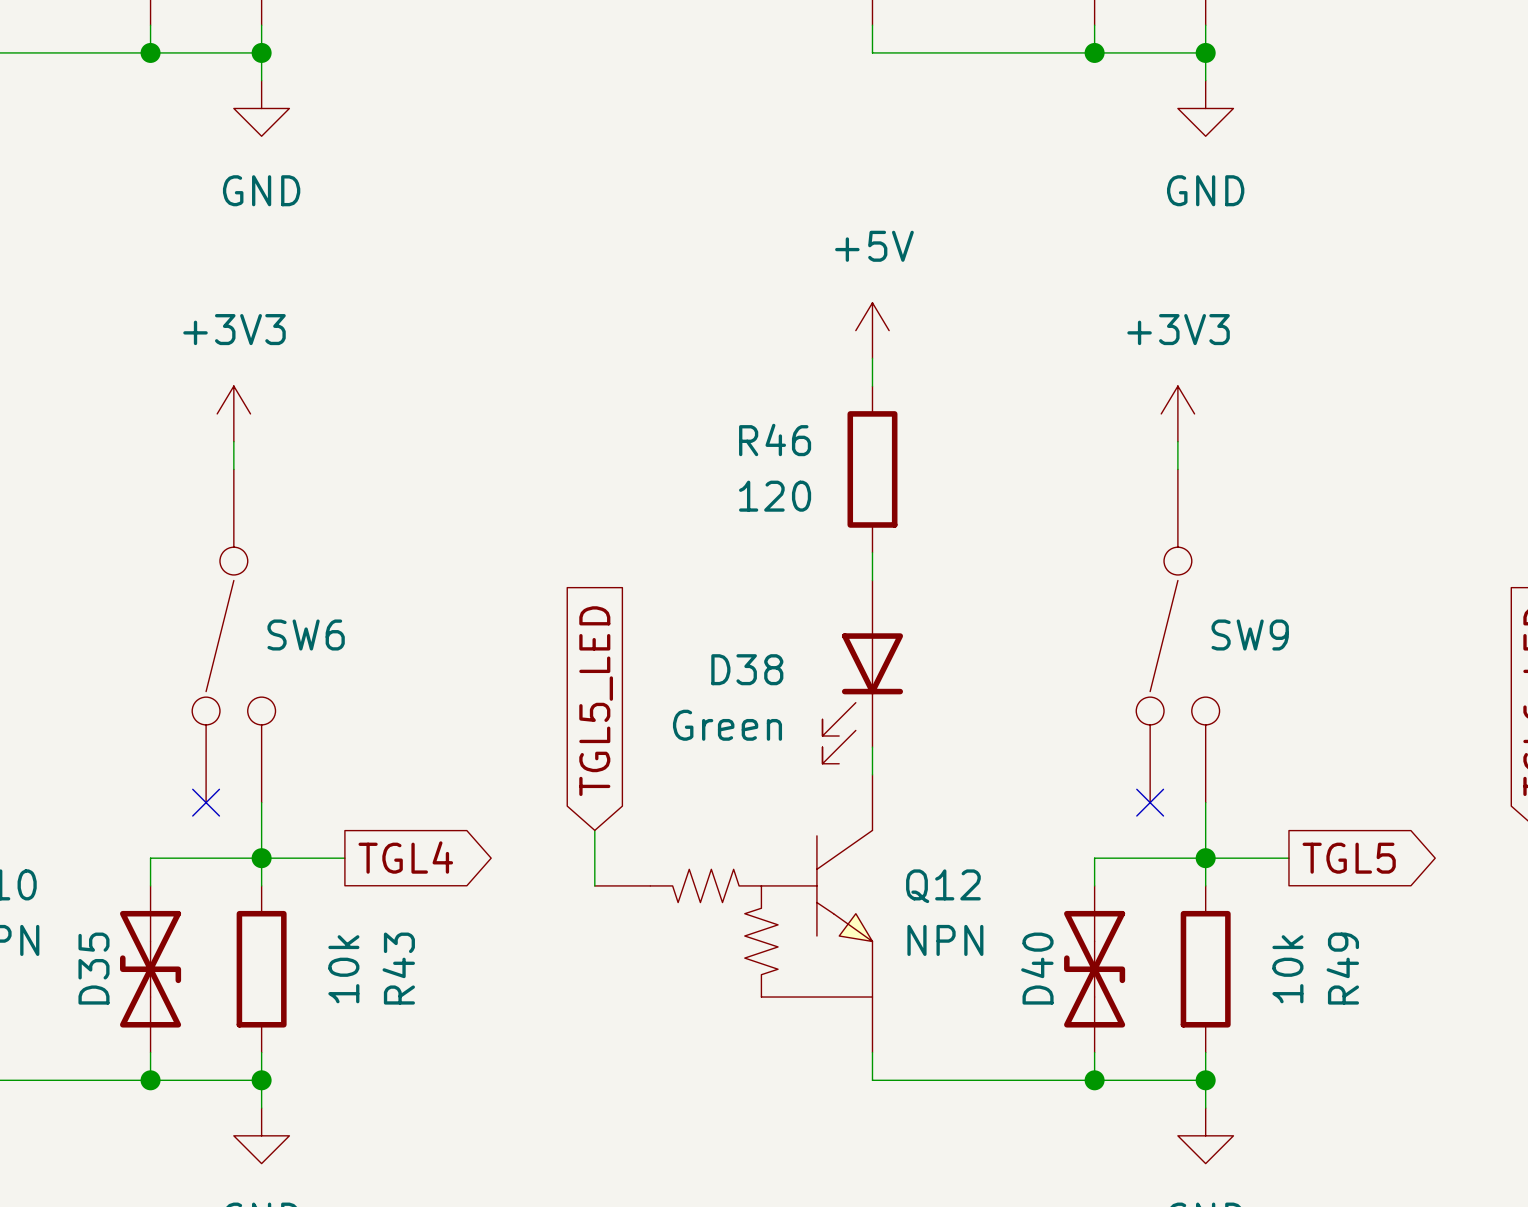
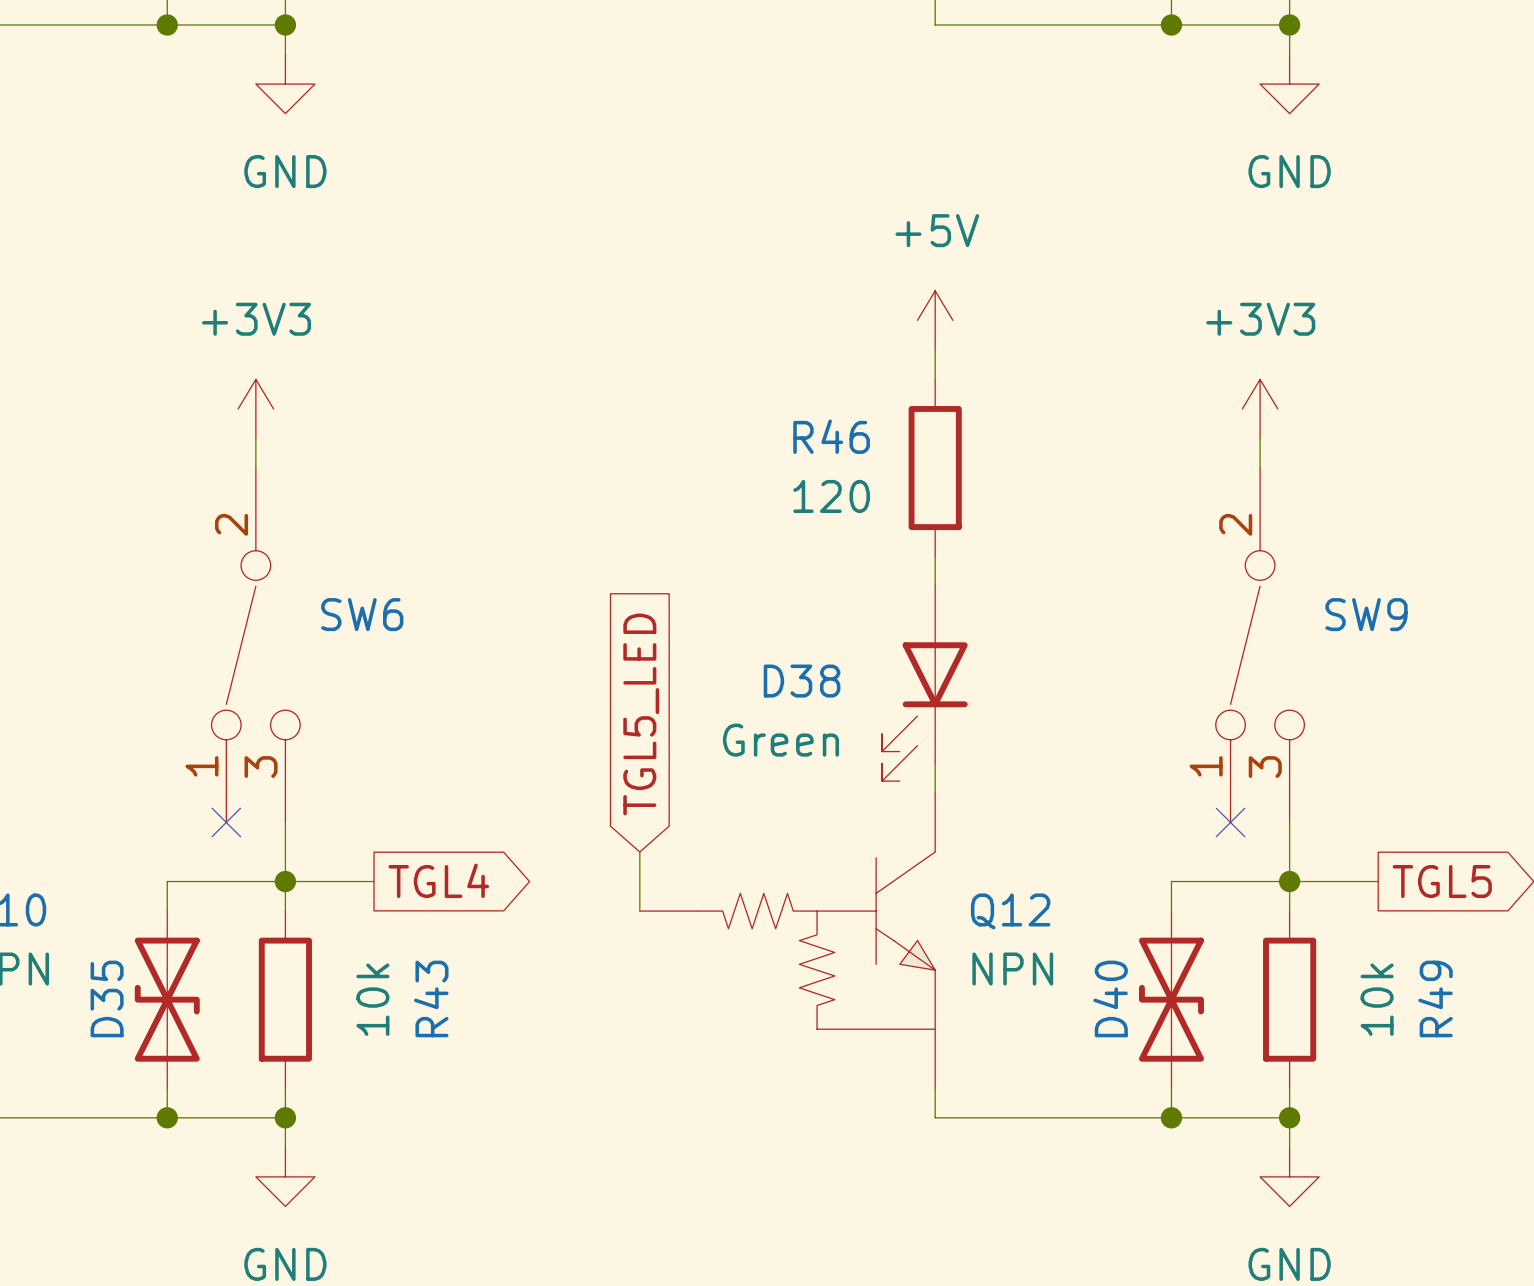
SW6 pin number: none -> 2 (231, 524)
SW9 pin number: none -> 2 (1235, 524)
SW6 name position: SW6 (306, 635) -> SW6 (362, 614)
SW9 name position: SW9 (1250, 635) -> SW9 (1366, 614)
SW6 pin number: none -> 1 (201, 766)
SW9 pin number: none -> 1 (1206, 766)
SW6 pin number: none -> 3 (261, 767)
SW9 pin number: none -> 3 (1265, 767)

